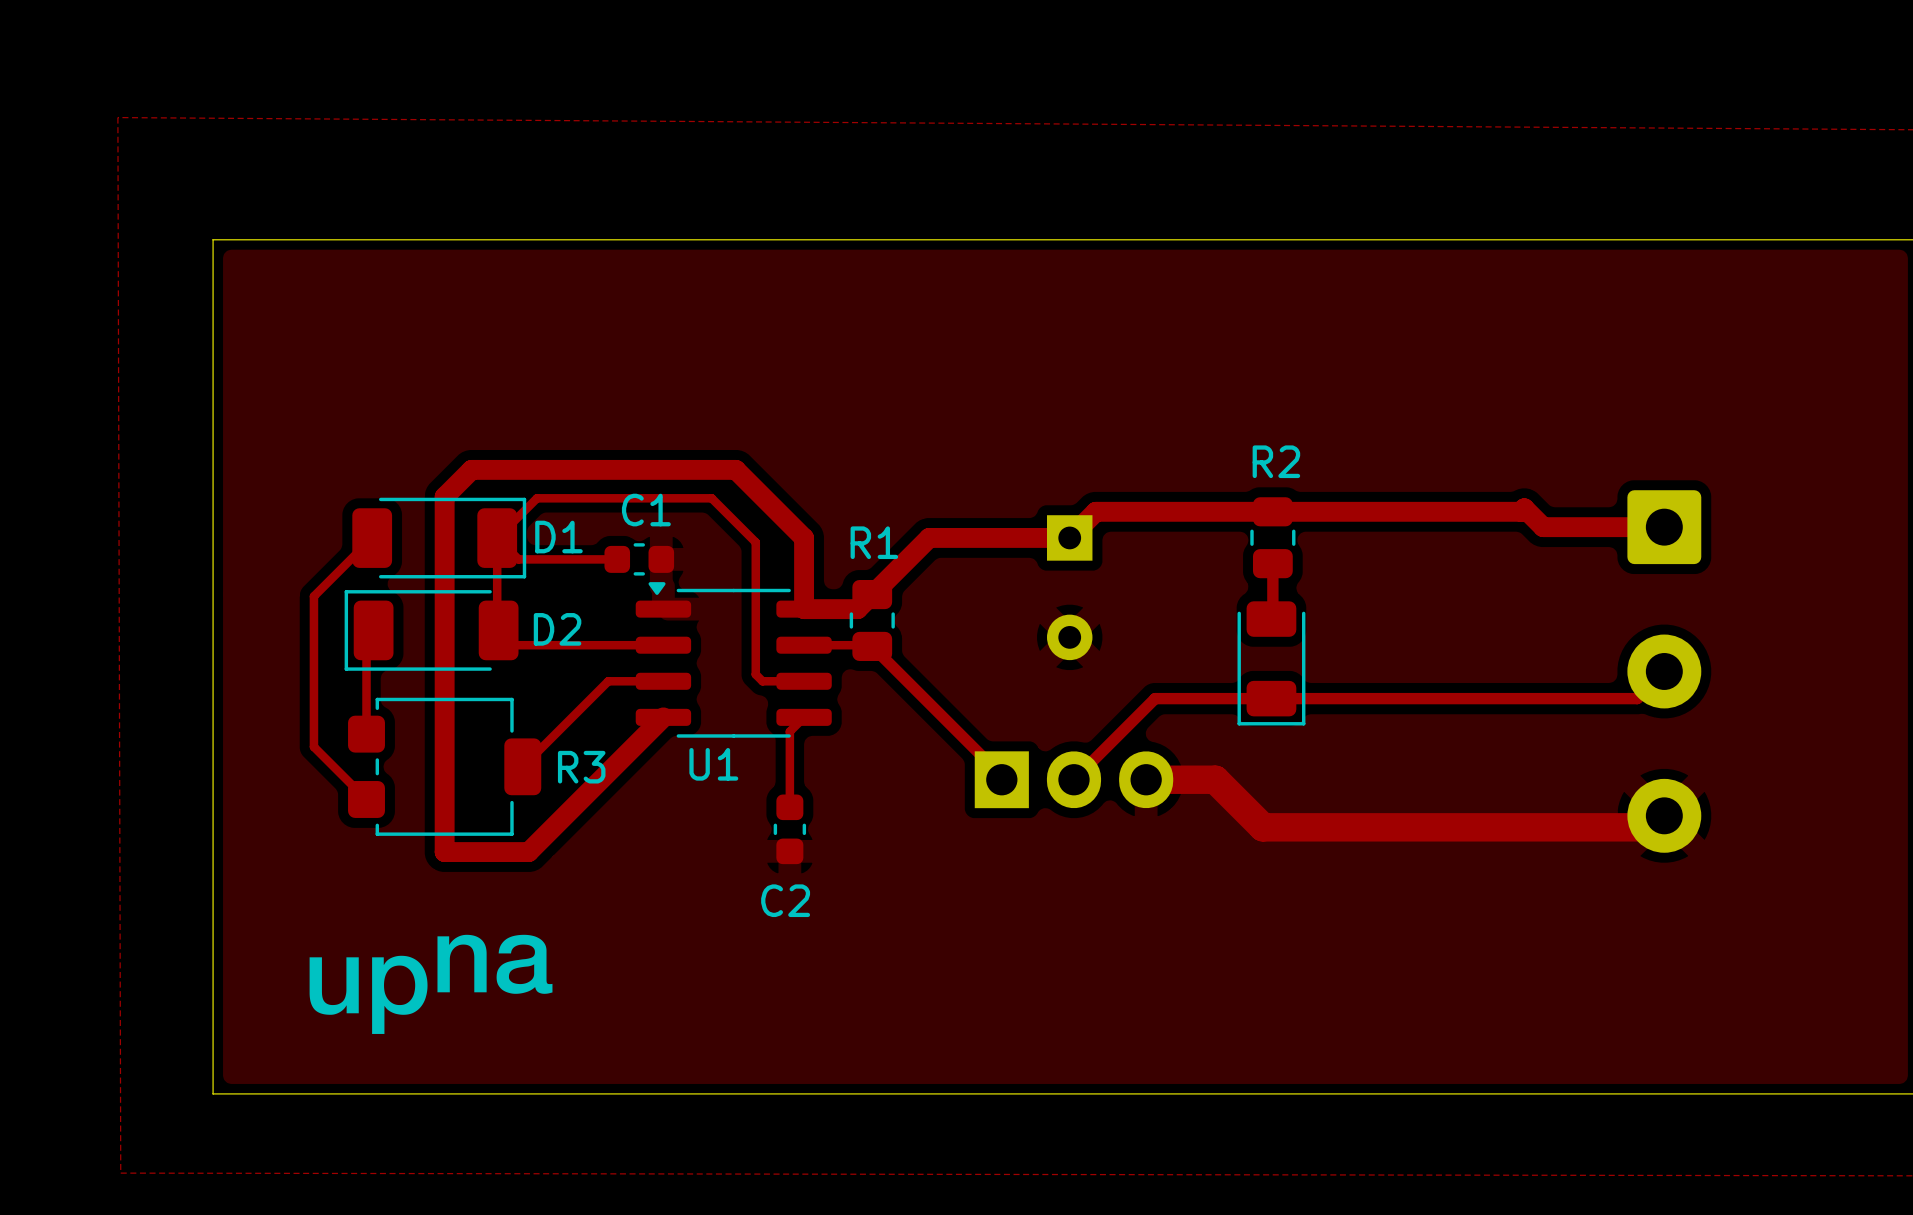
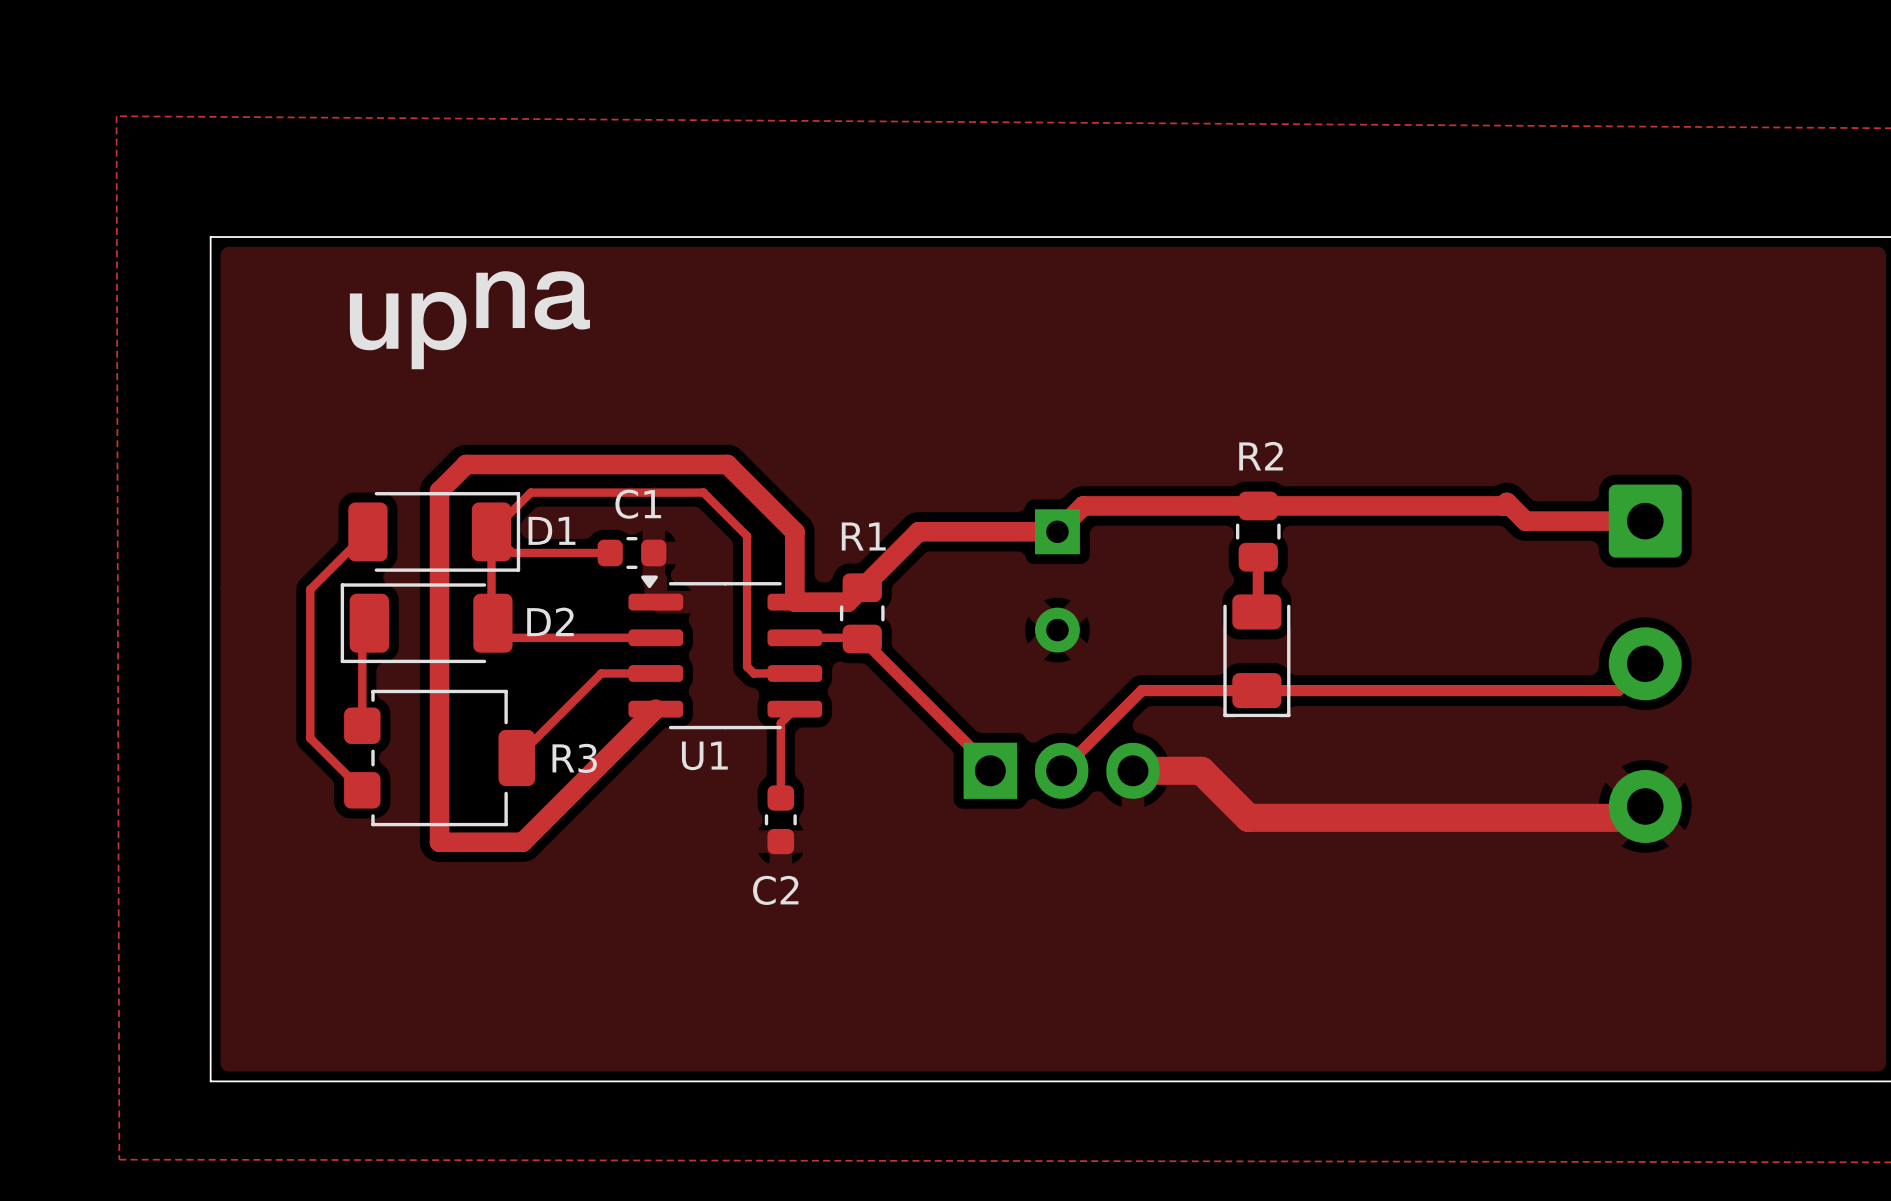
drawing position: (462, 963) -> (500, 299)
drawing position: (524, 964) -> (562, 300)
drawing position: (334, 986) -> (374, 321)
drawing position: (399, 994) -> (439, 330)

